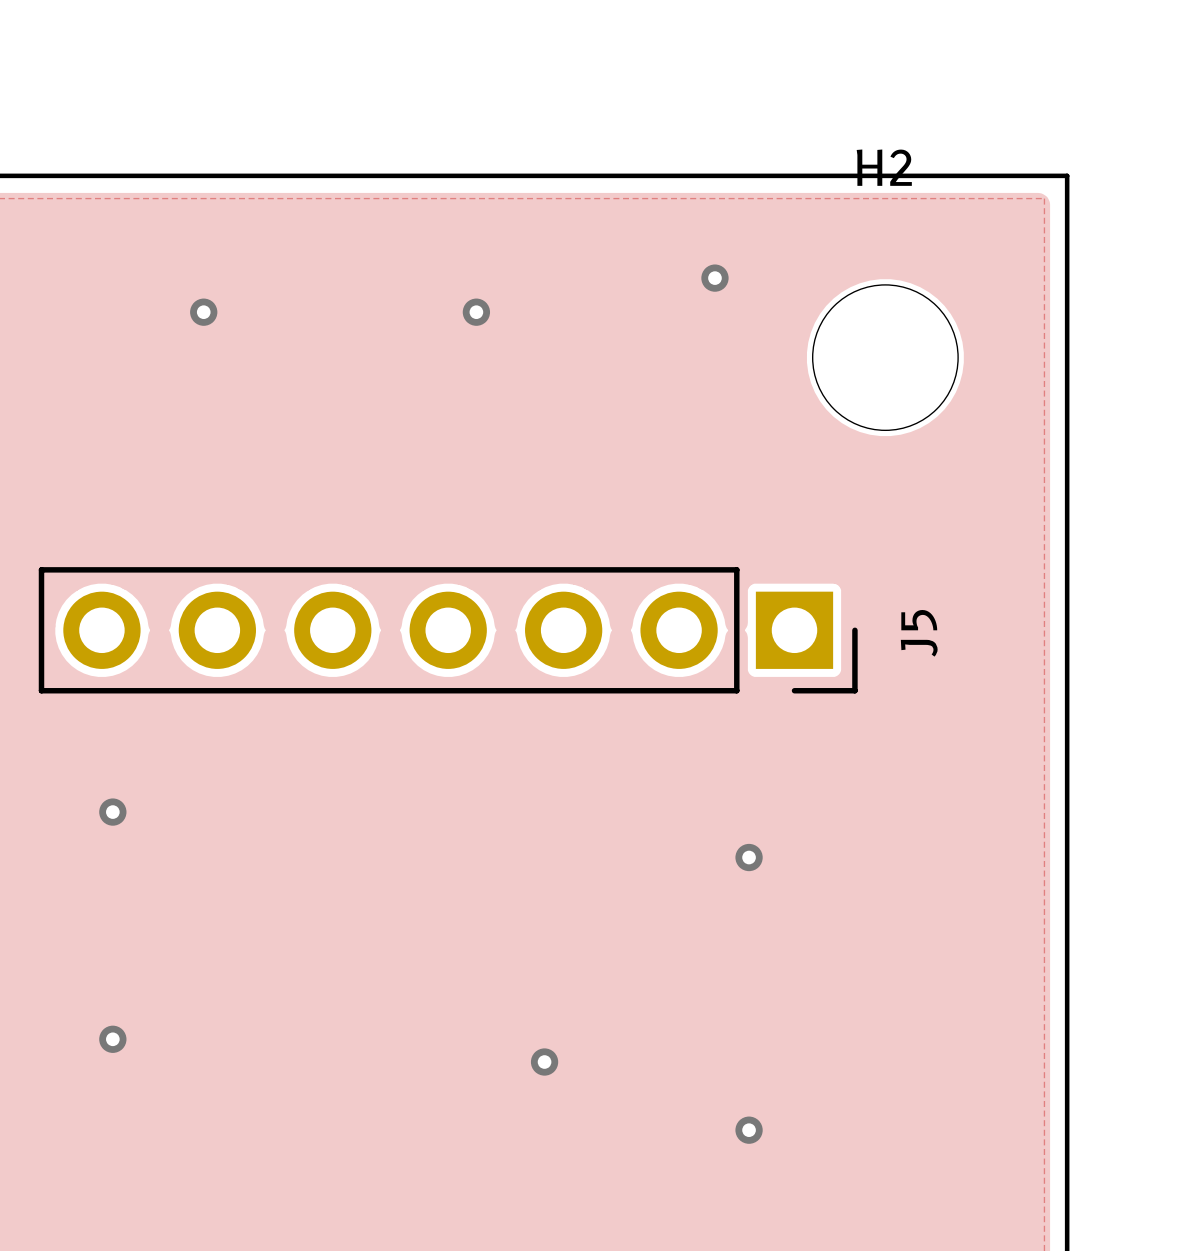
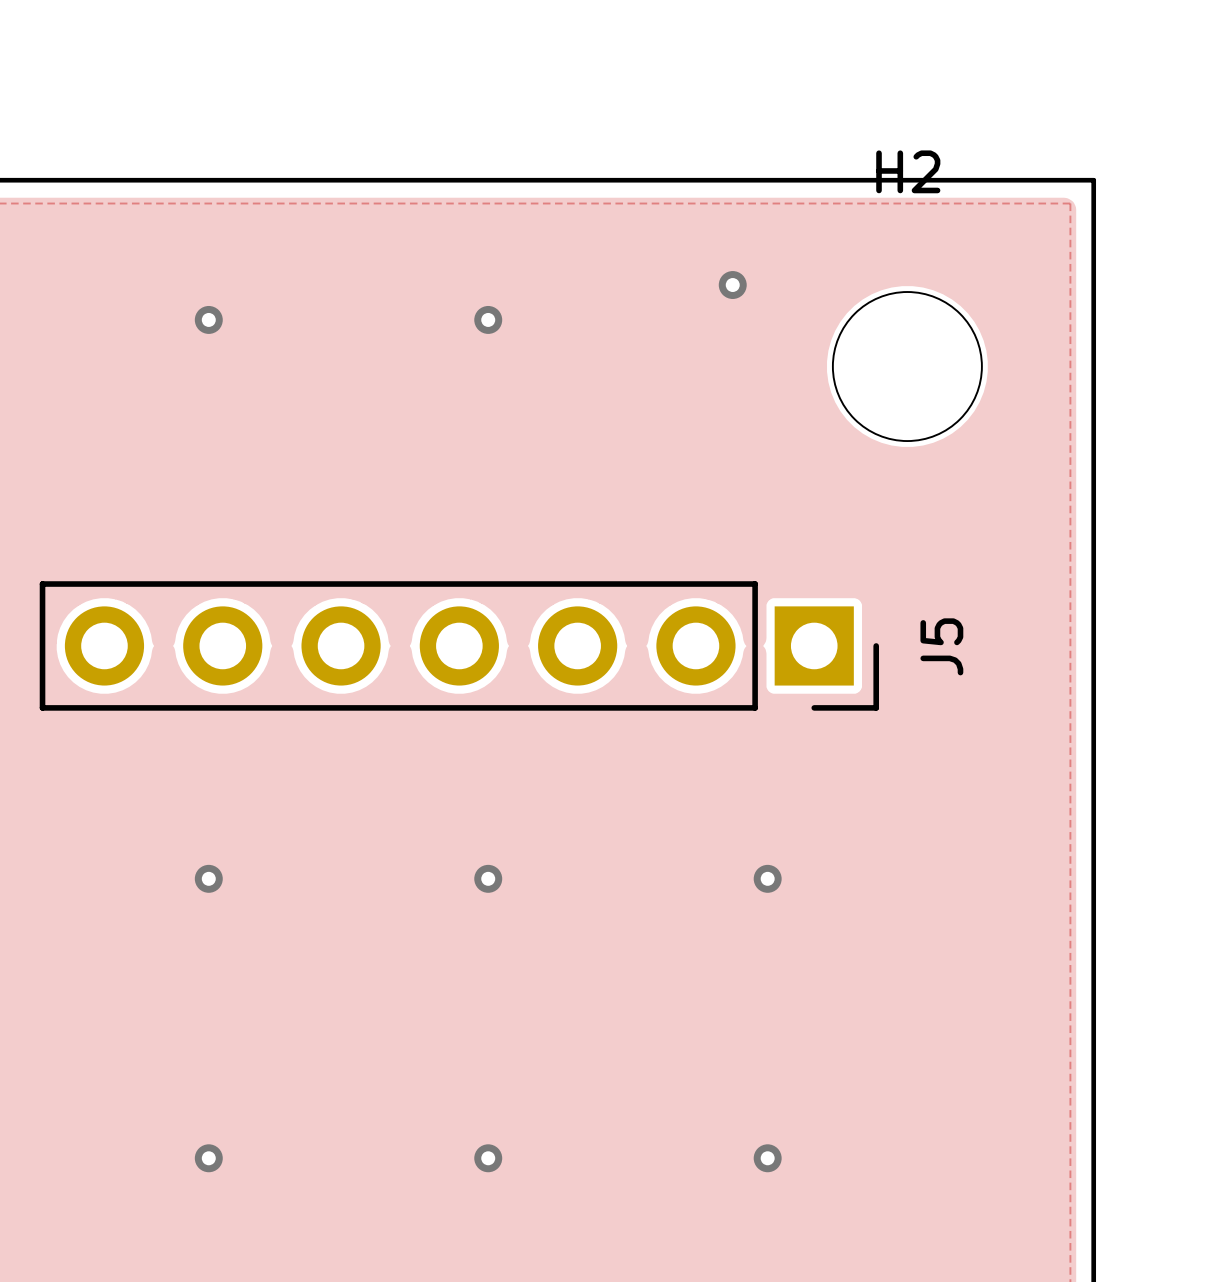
via: (112, 812) -> none
via: none -> (208, 878)
via: none -> (488, 878)
via: (112, 1039) -> none
via position: (544, 1062) -> (488, 1158)
via: none -> (208, 1158)

